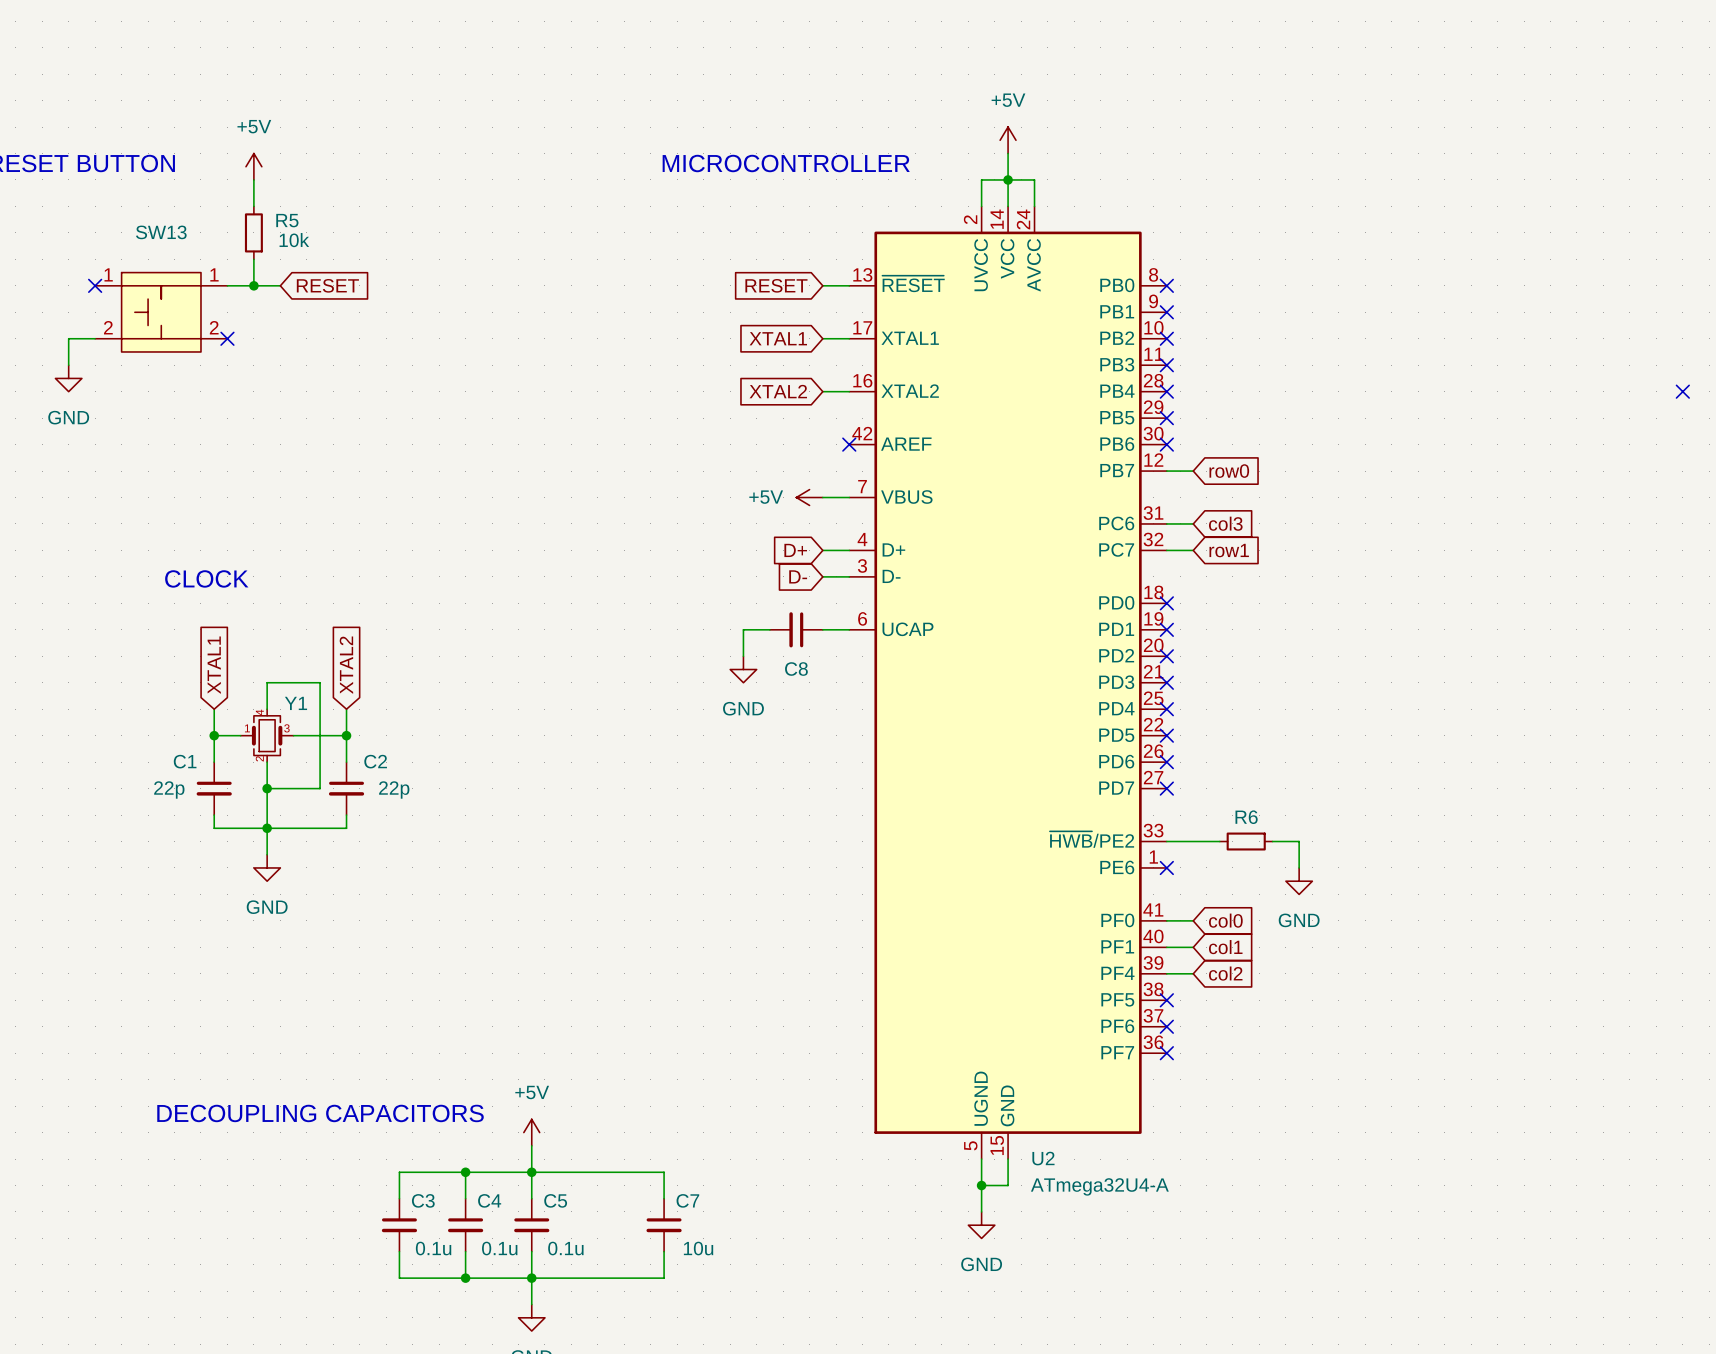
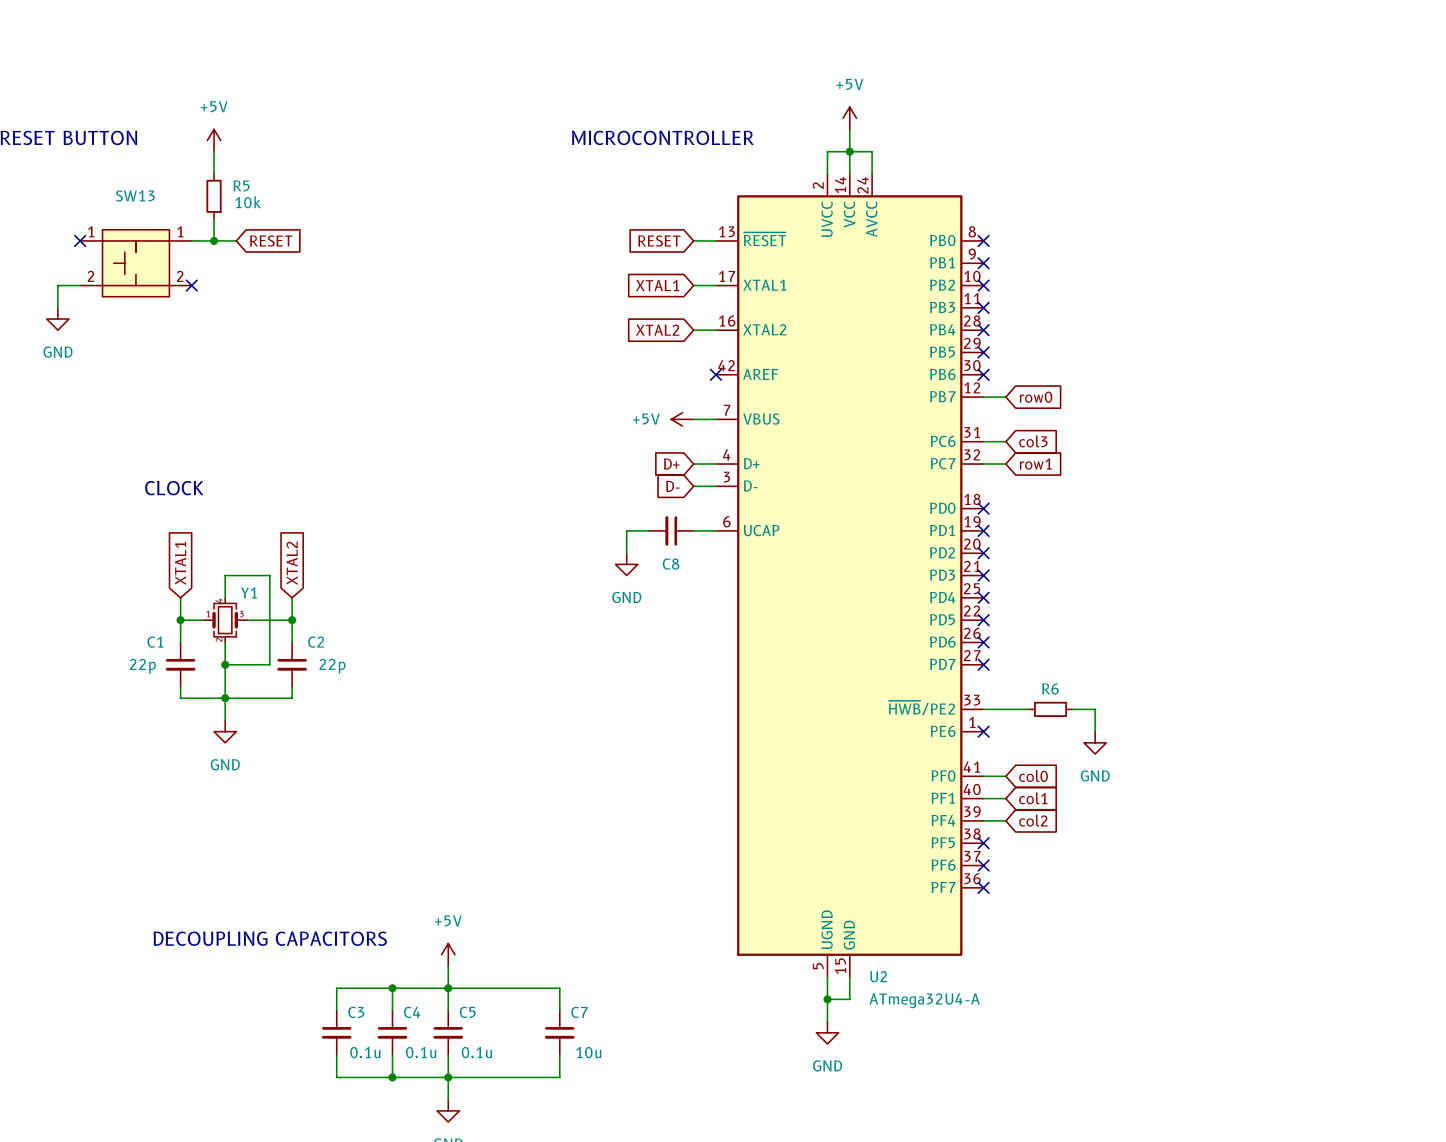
no-connect mark: (1682, 391) -> none

